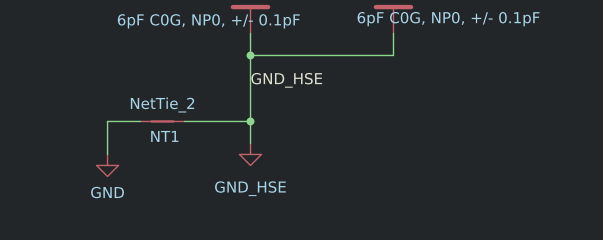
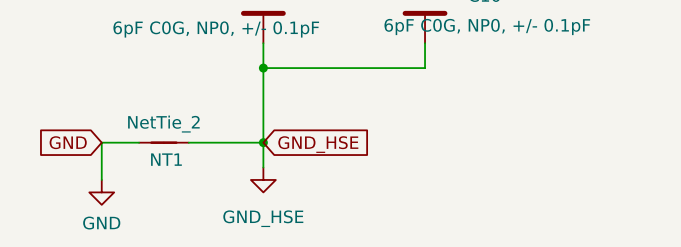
label: GND_HSE (286, 80) -> none
global label: none -> GND (68, 142)
global label: none -> GND_HSE (318, 144)

